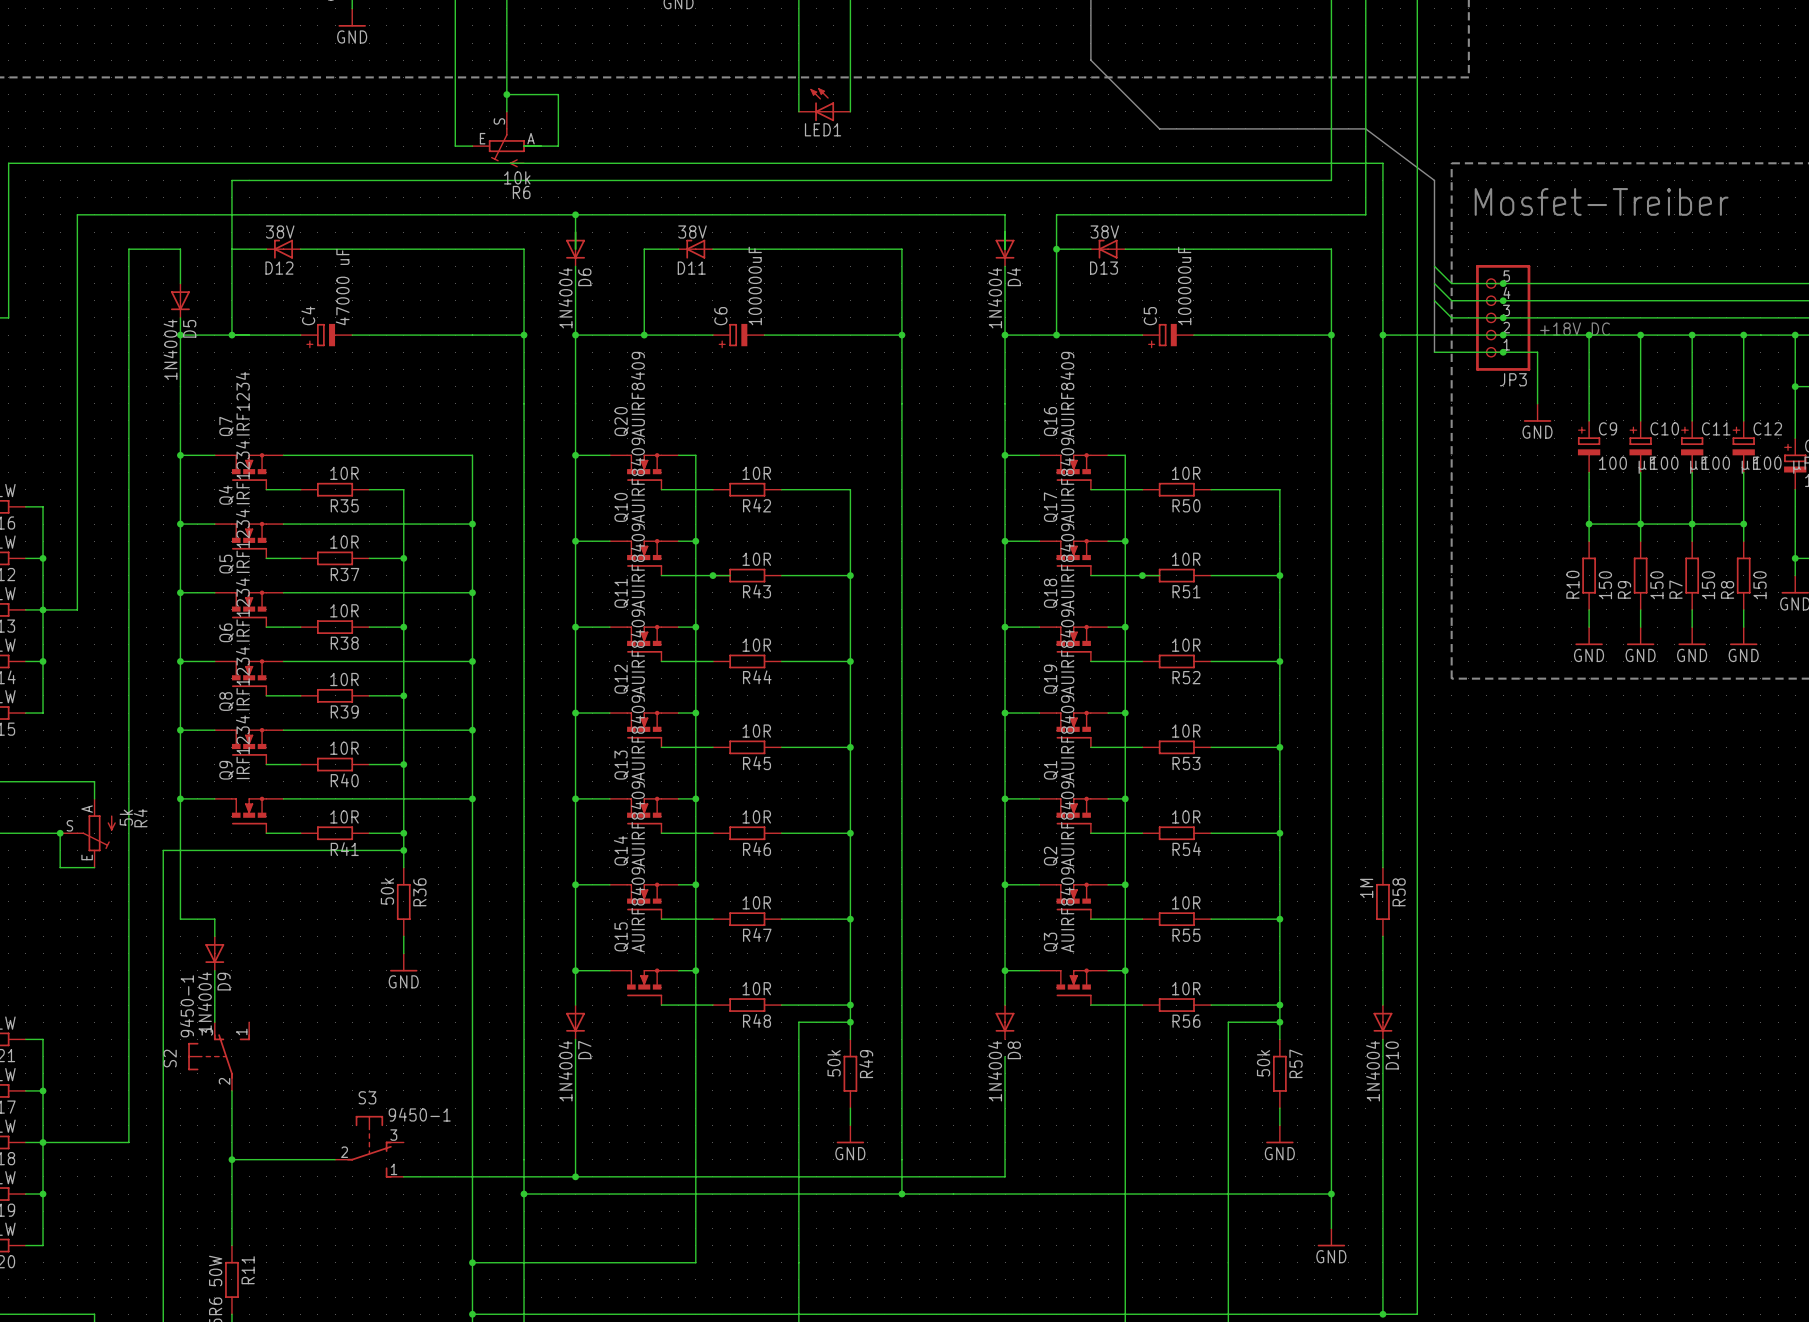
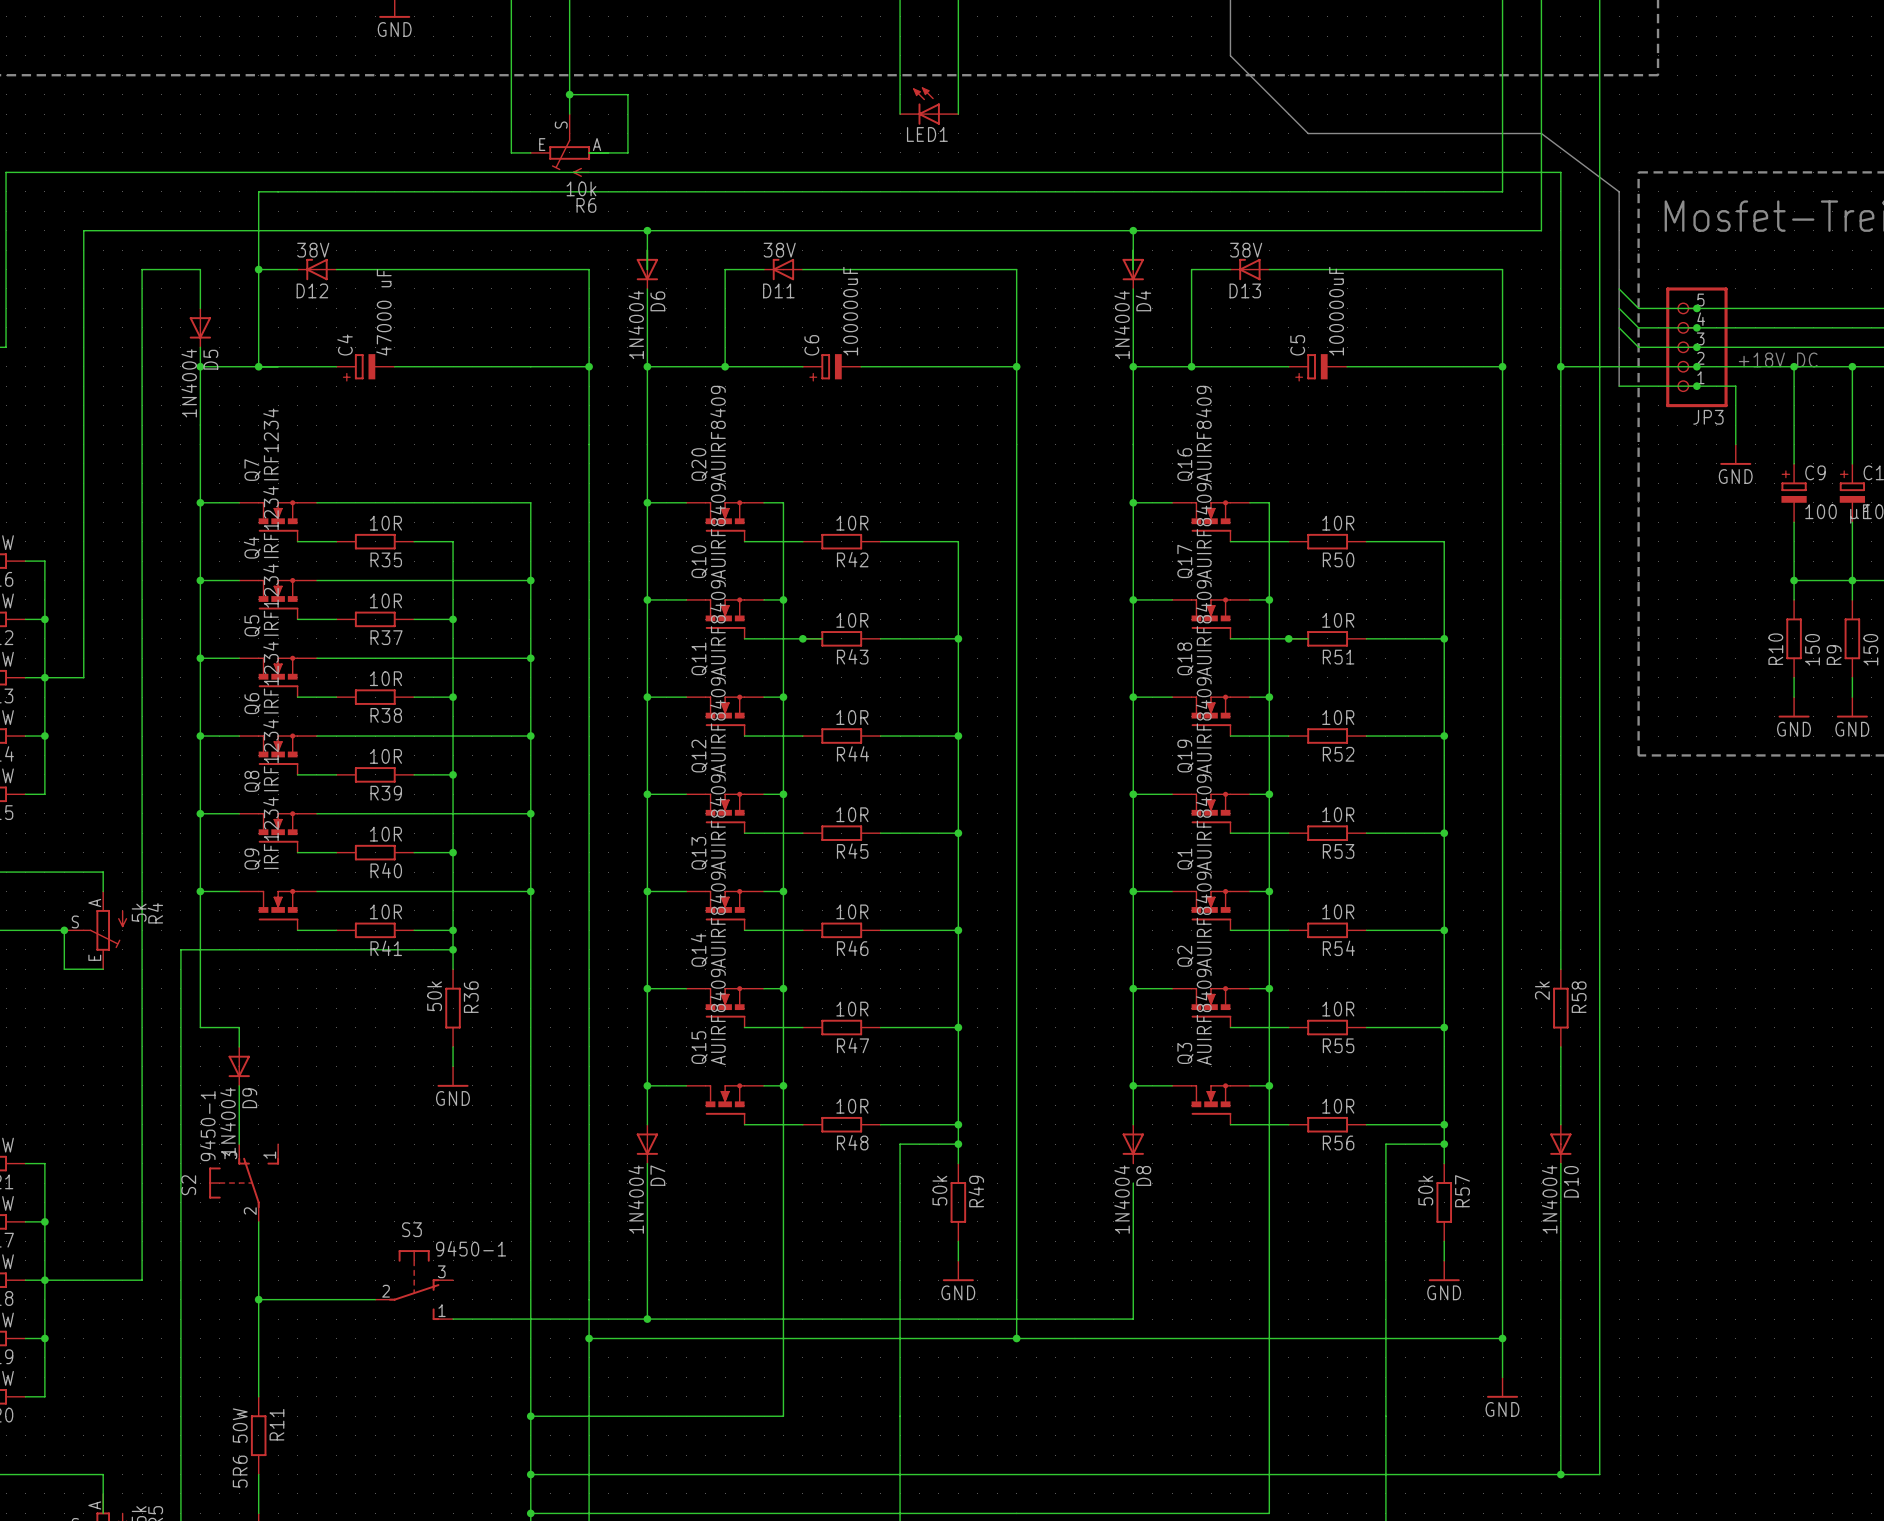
junction: none -> (1133, 230)
wire: (1056, 214) (1056, 249) -> (1191, 230) (1133, 230)
junction: none -> (258, 269)
junction: (1056, 249) -> none
R58 value: 1M (1366, 888) -> 2k (1542, 990)

